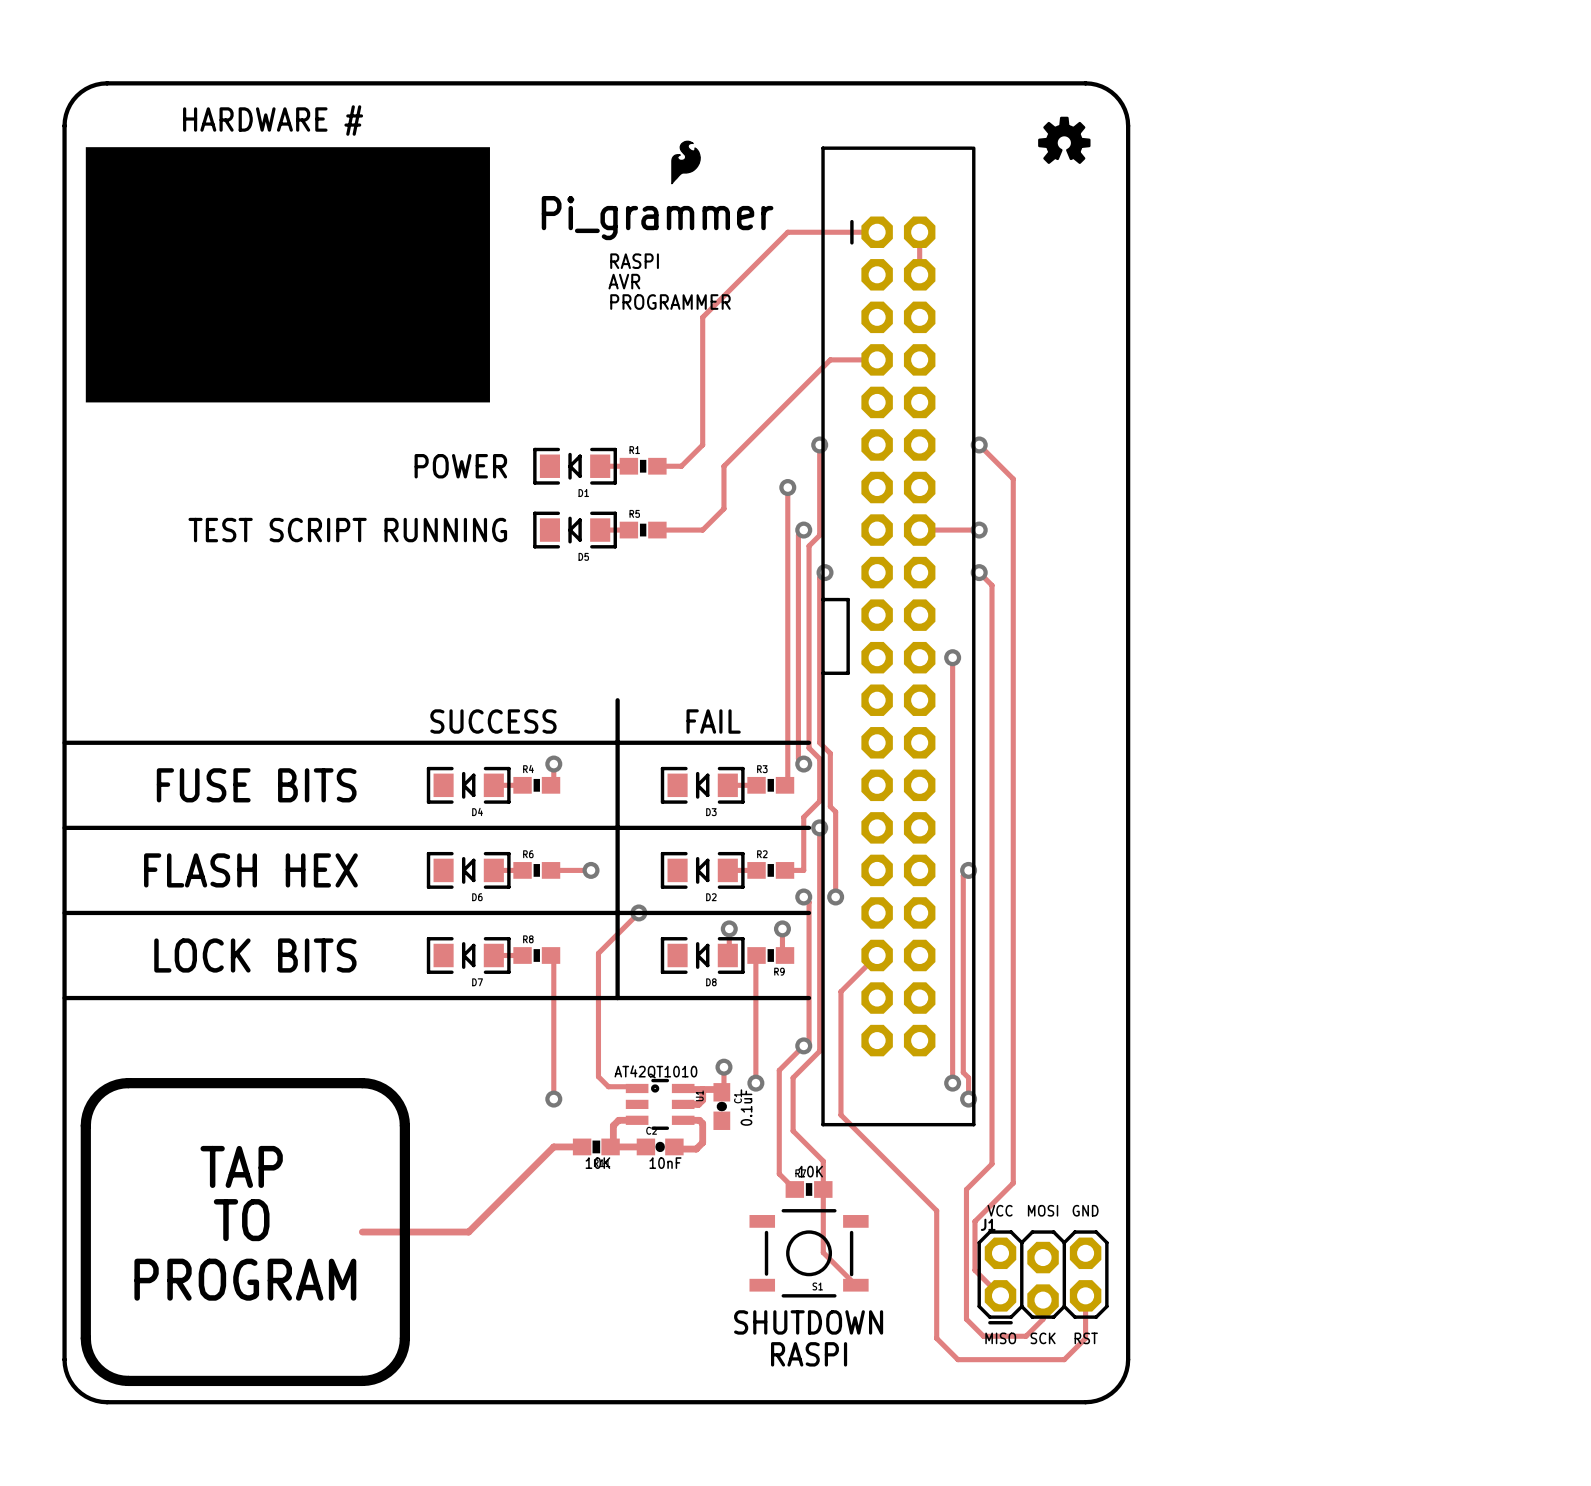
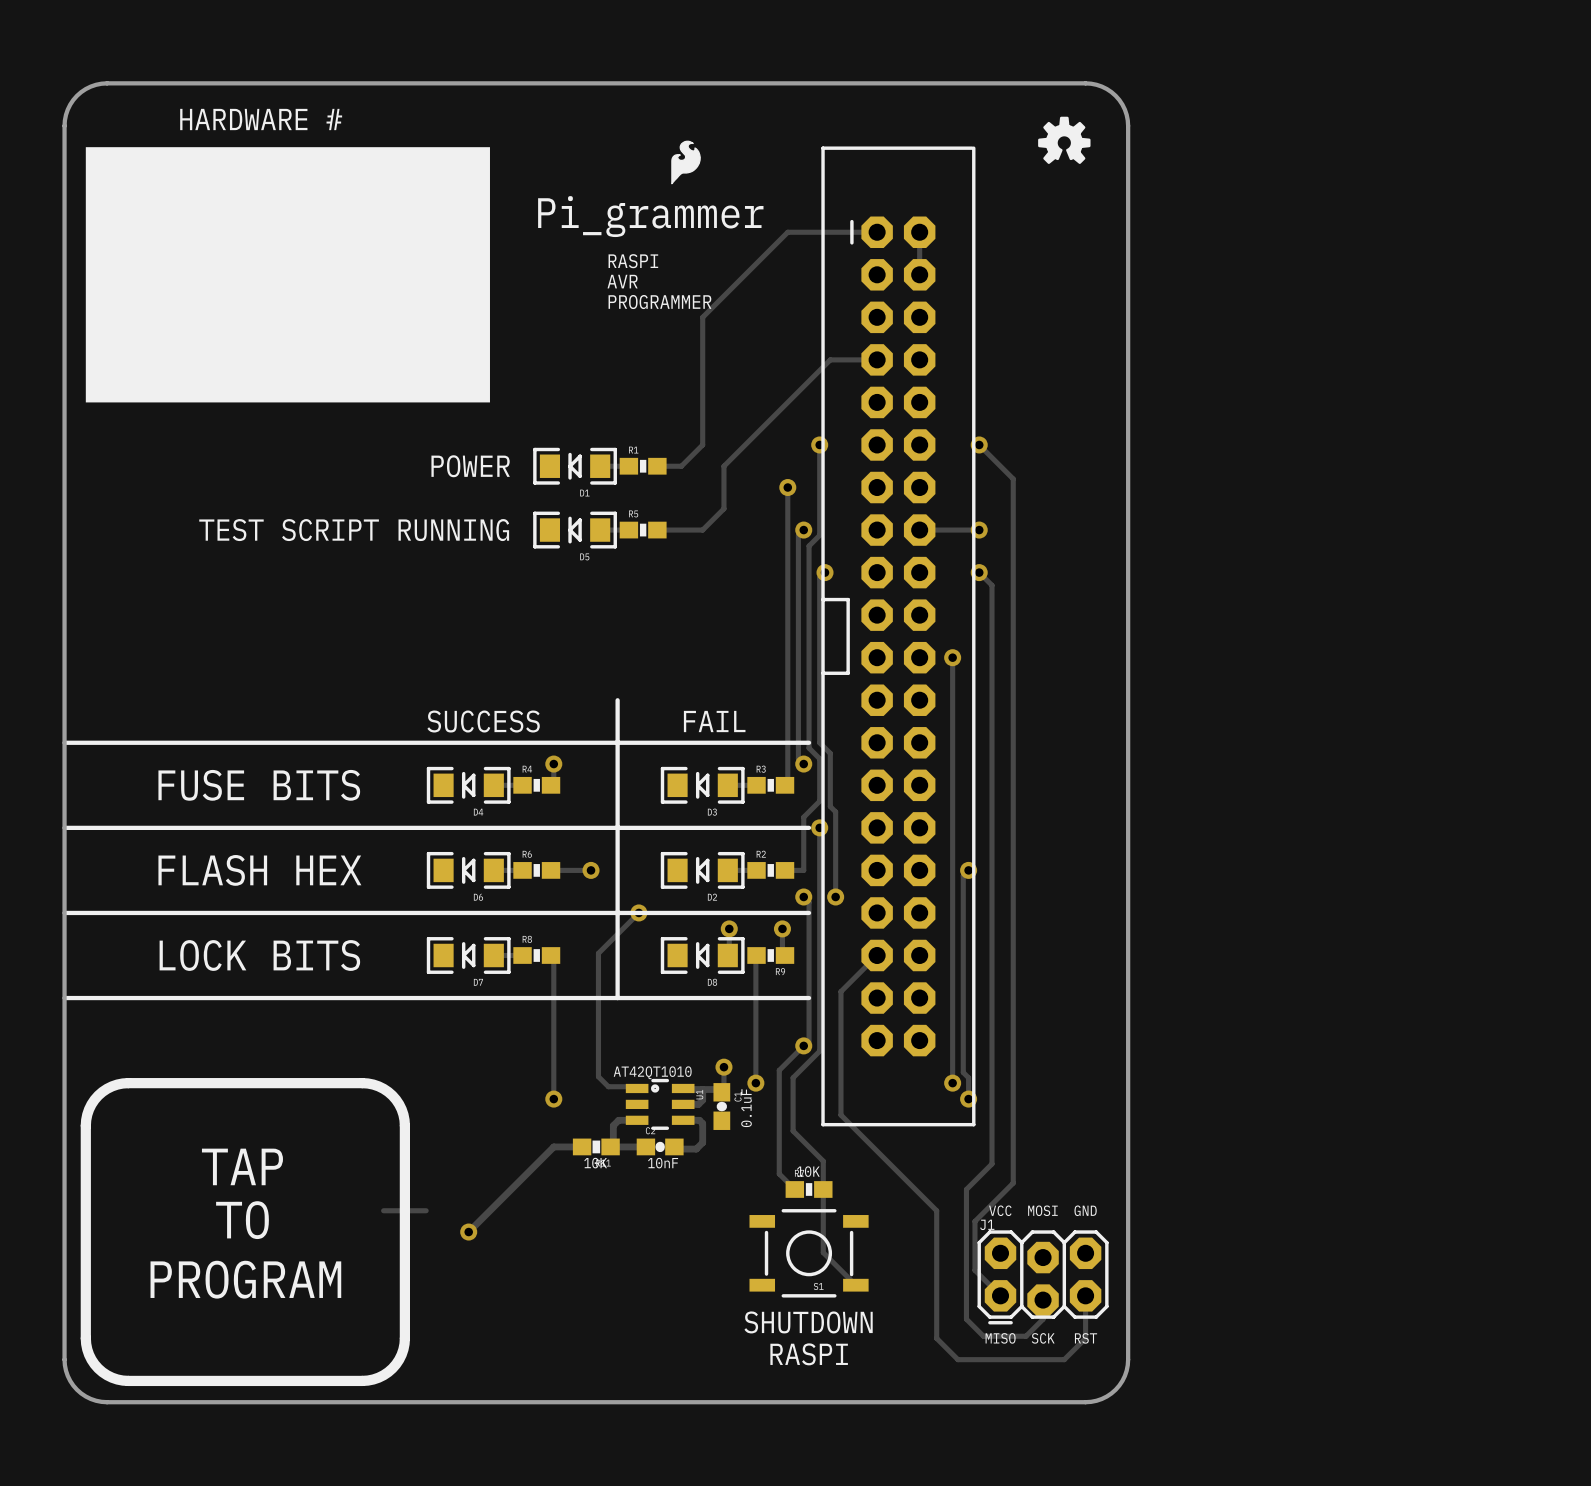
track: none -> (383, 1210) (426, 1210)
track: (362, 1232) (468, 1232) -> none
via: none -> (468, 1232)

